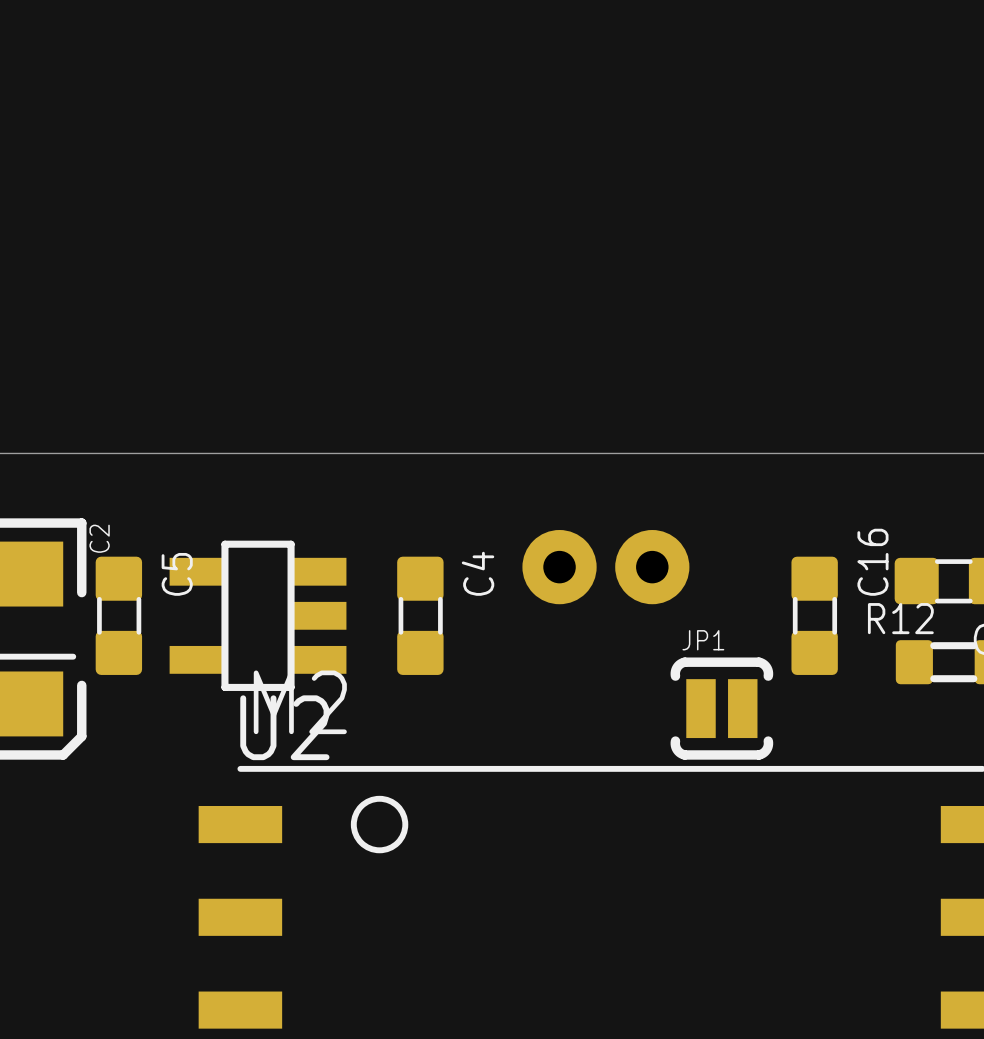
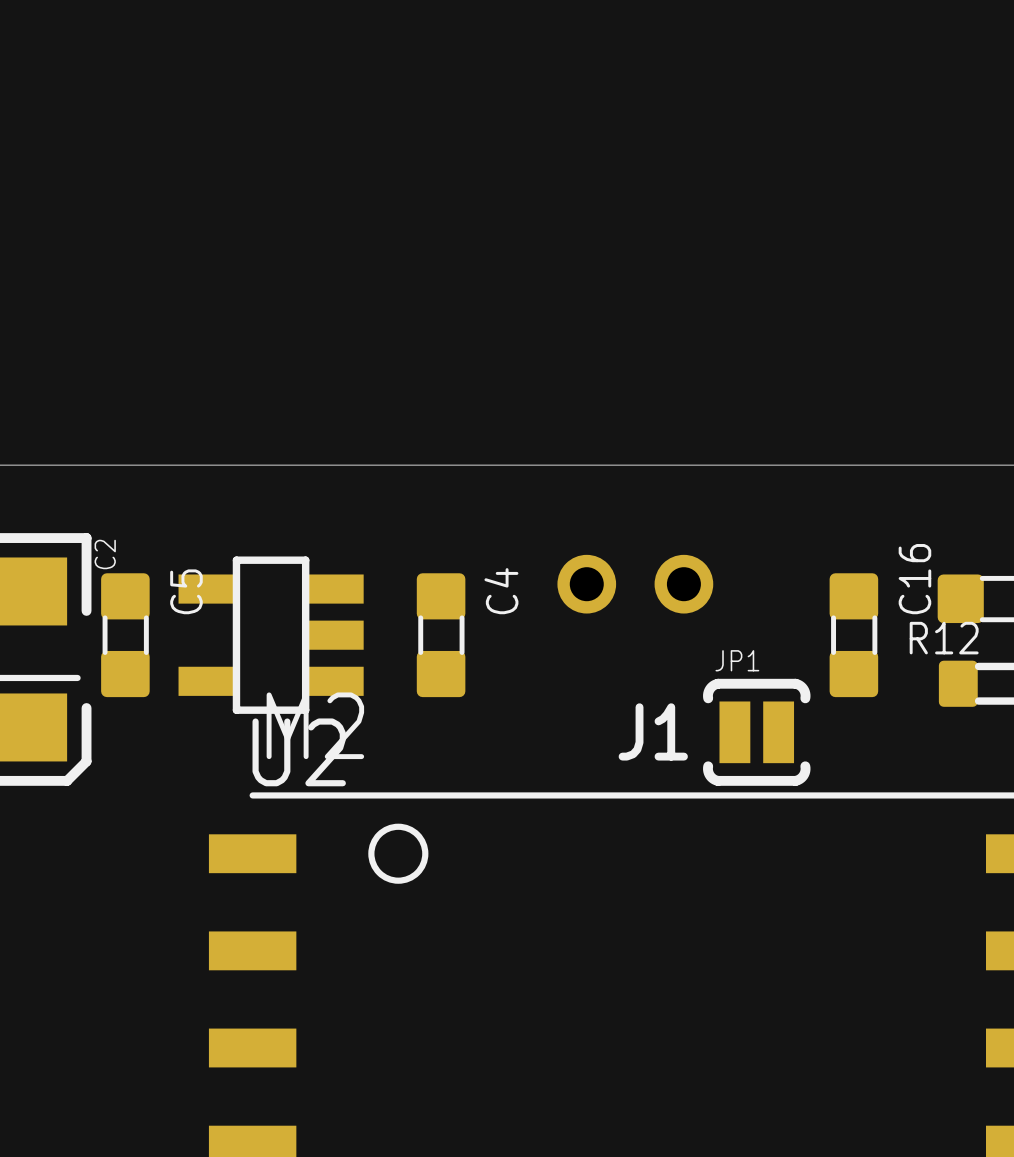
part footprint: [522, 530, 690, 605] -> [557, 554, 714, 614]
text: none -> J1 (653, 731)

